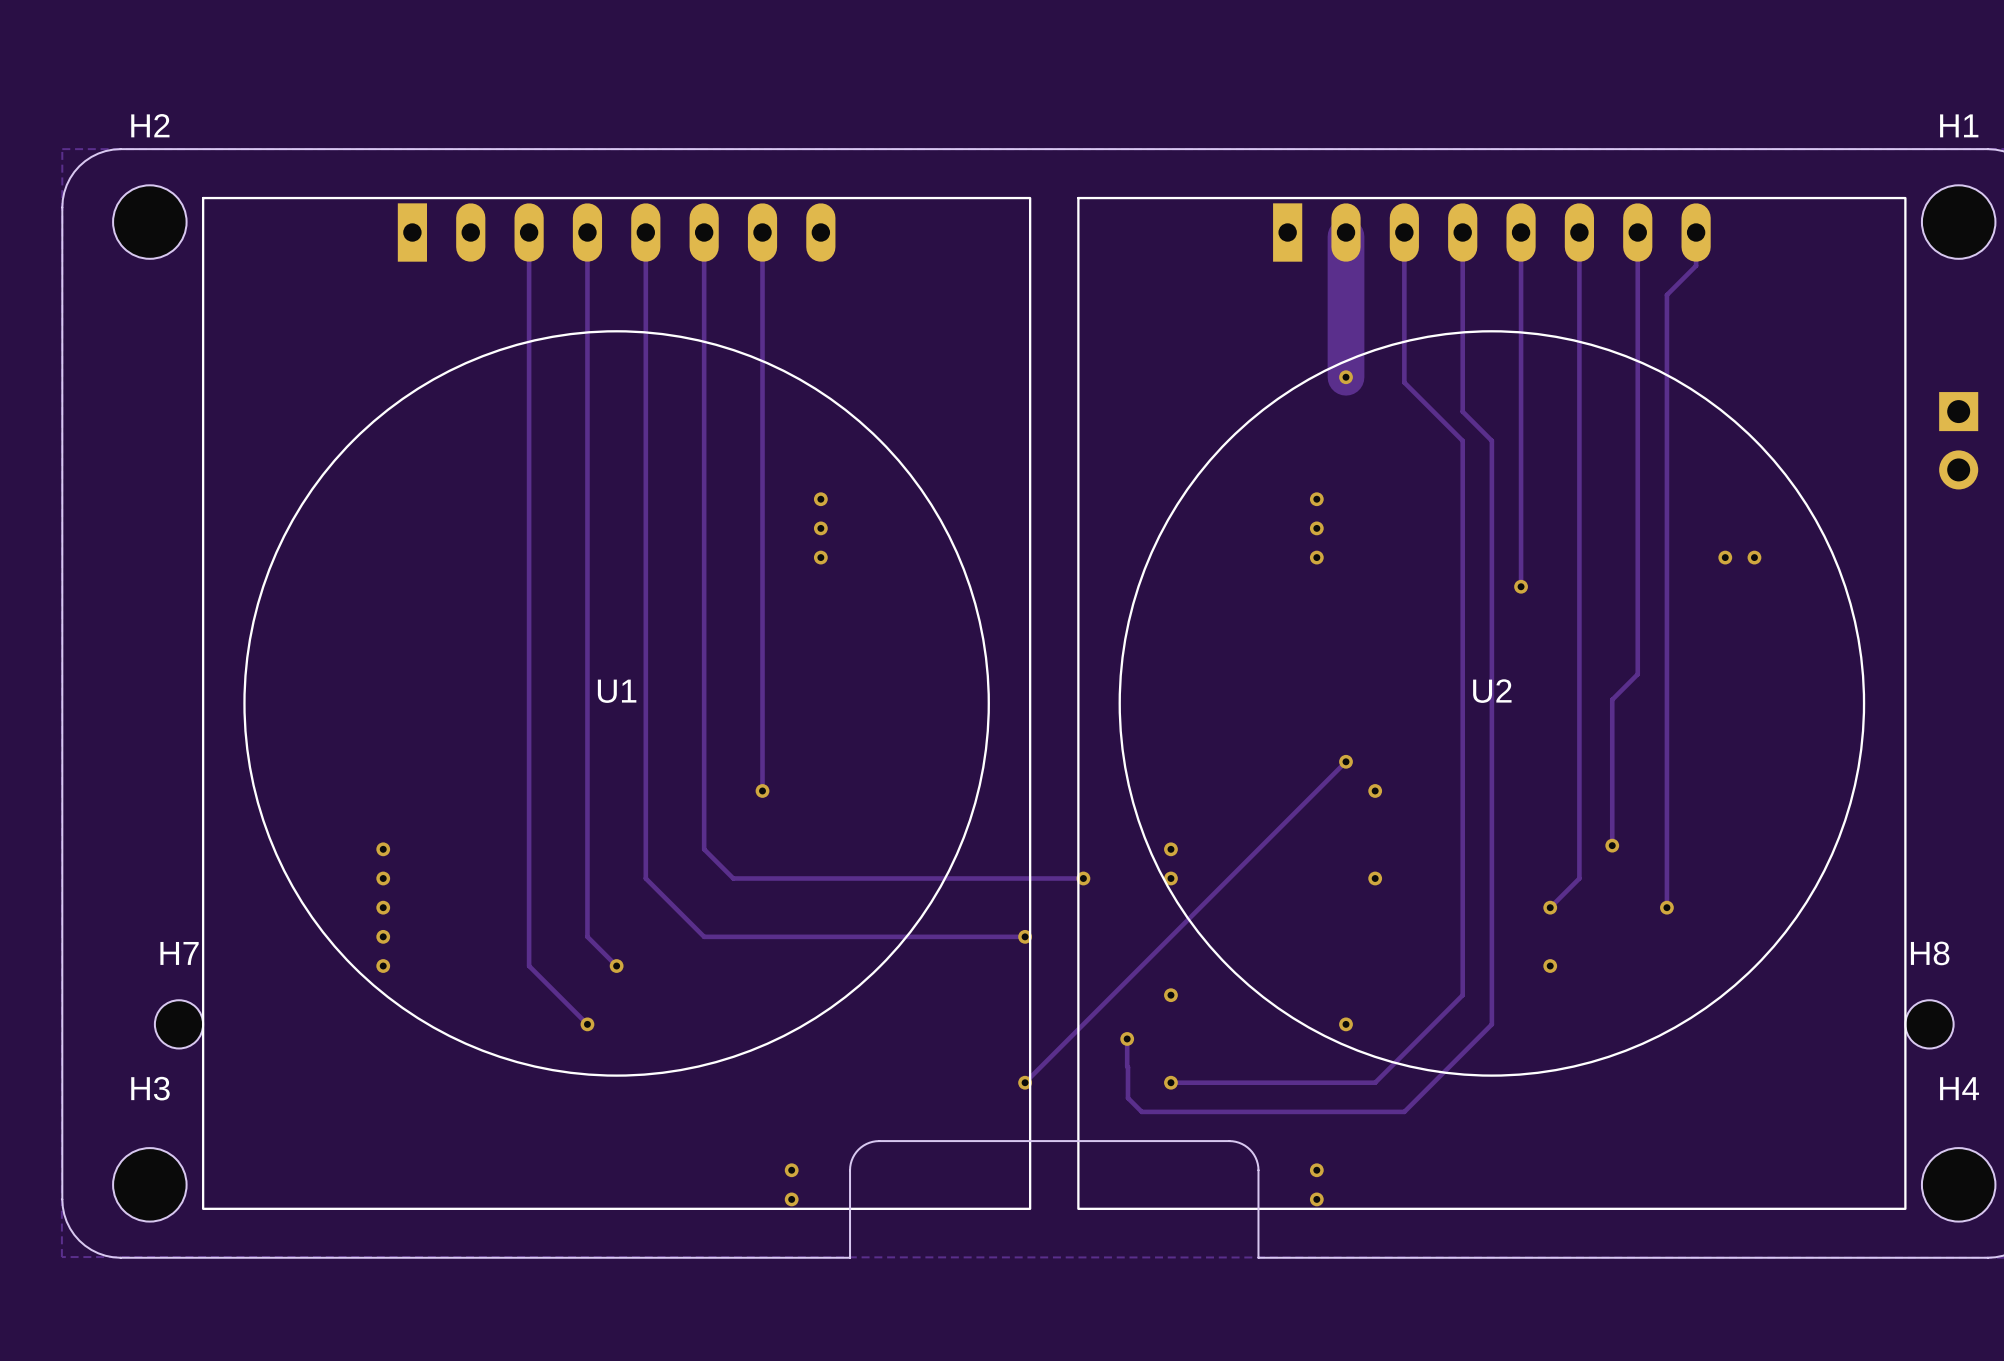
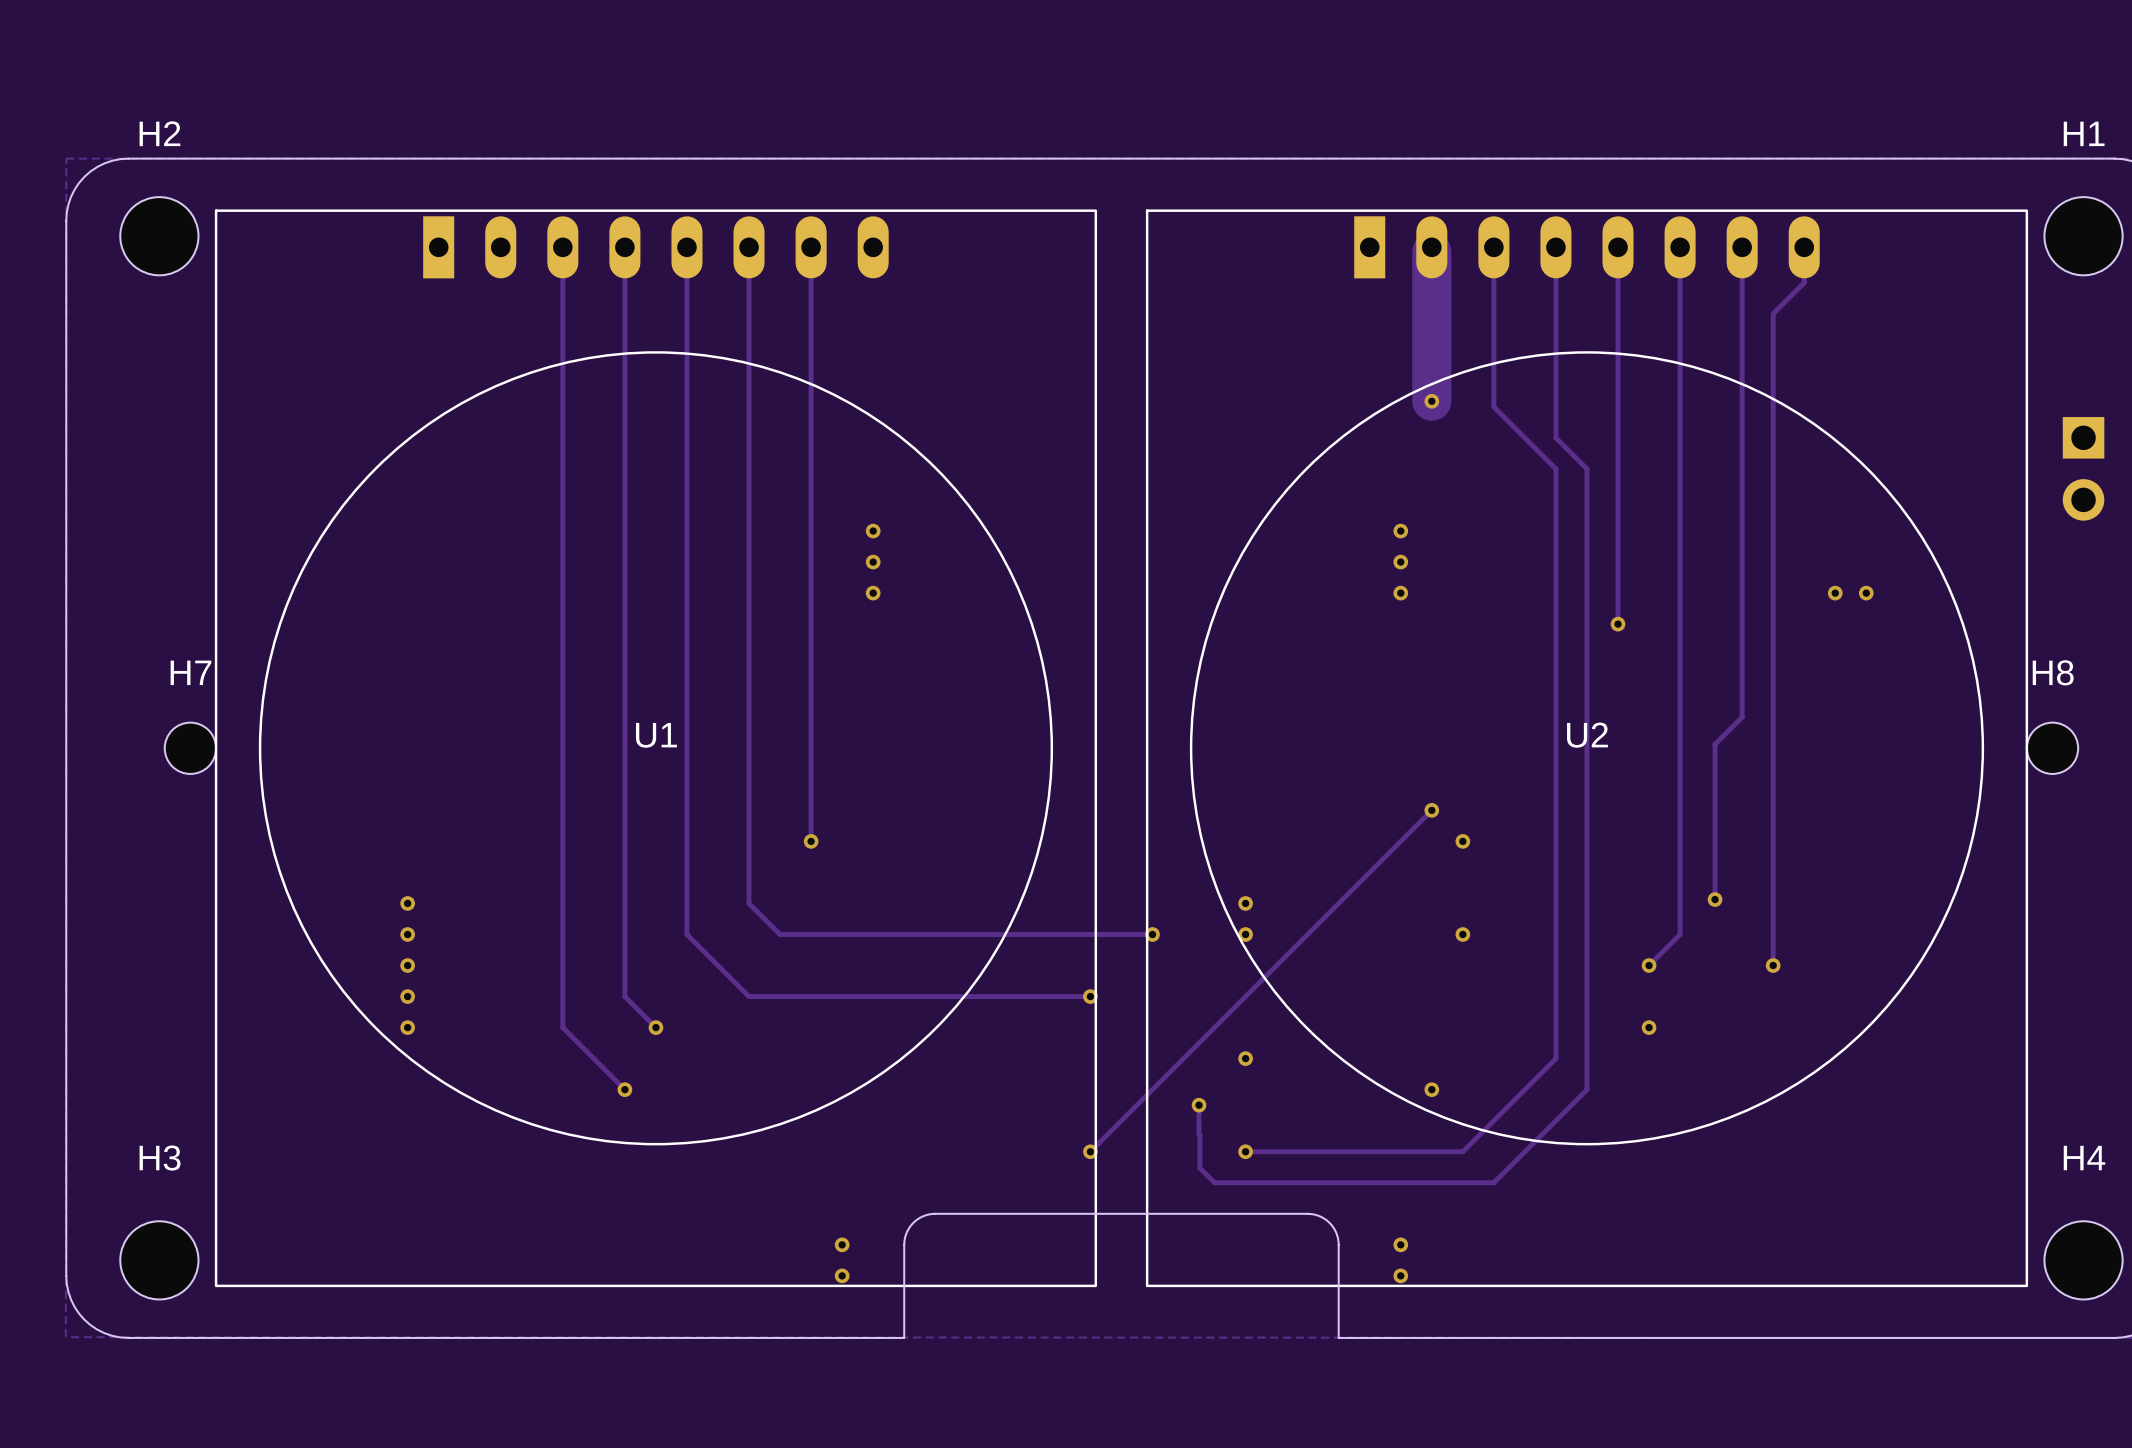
H7 position: (179, 1024) -> (190, 748)
H8 position: (1929, 1024) -> (2052, 748)

